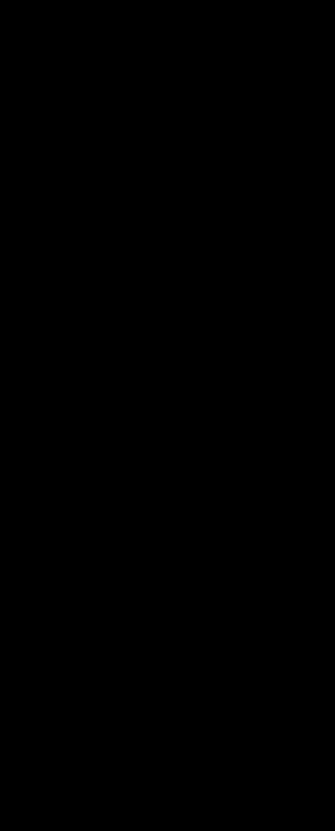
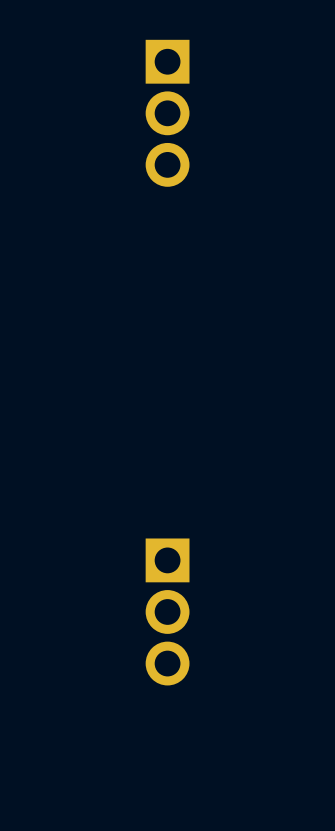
part: none -> (167, 113)
part: none -> (167, 611)

